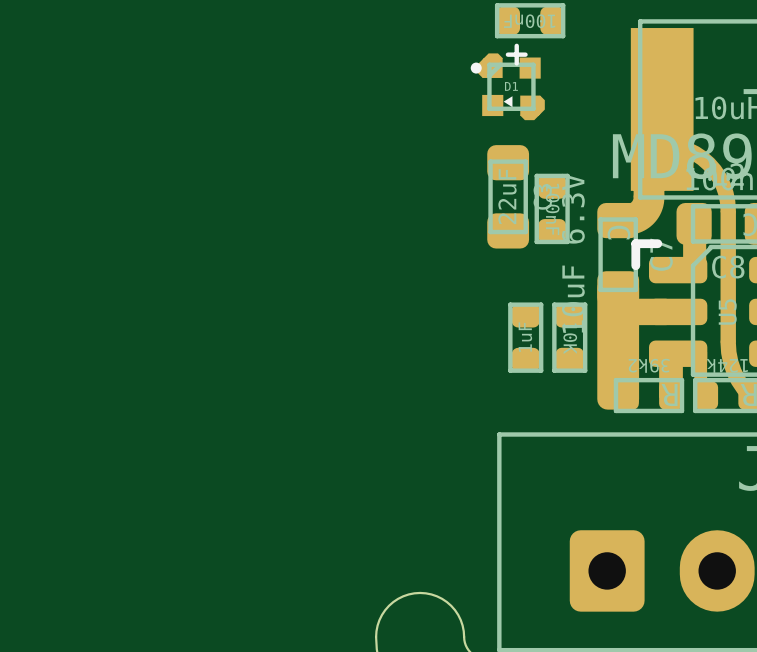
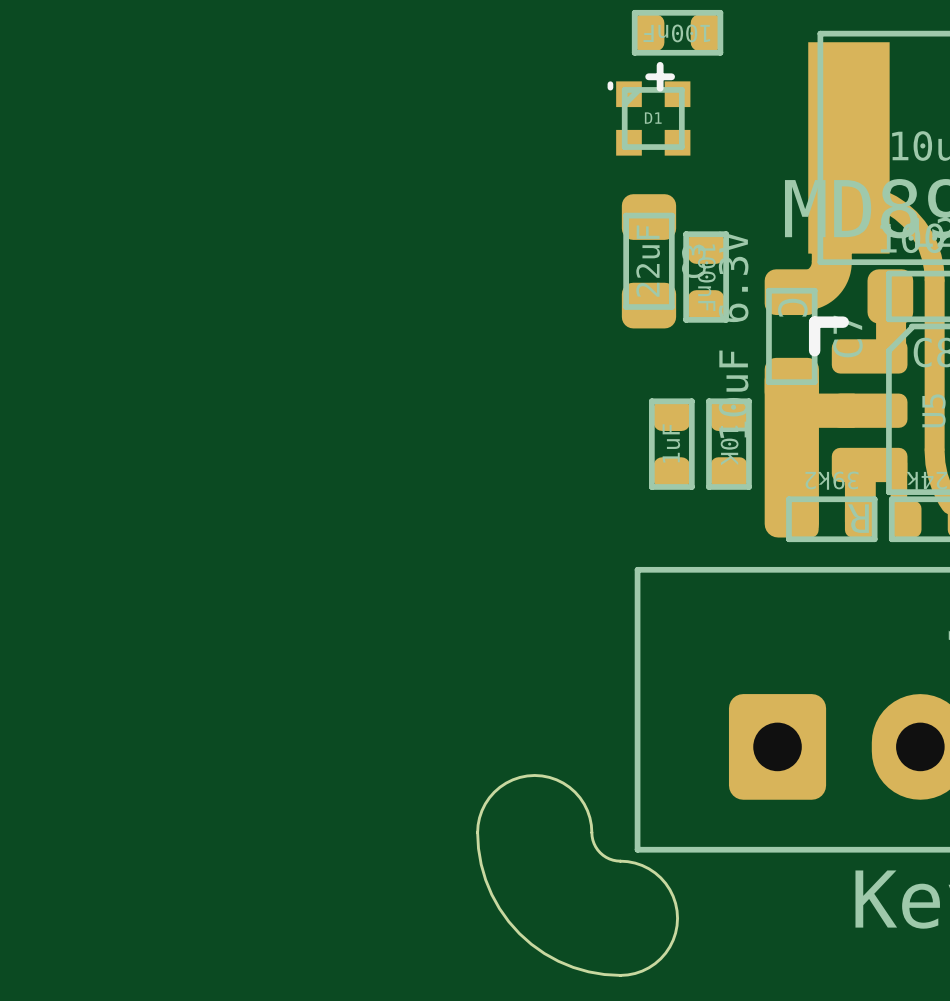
D1 footprint: [470, 43, 545, 121] -> [607, 61, 691, 156]

